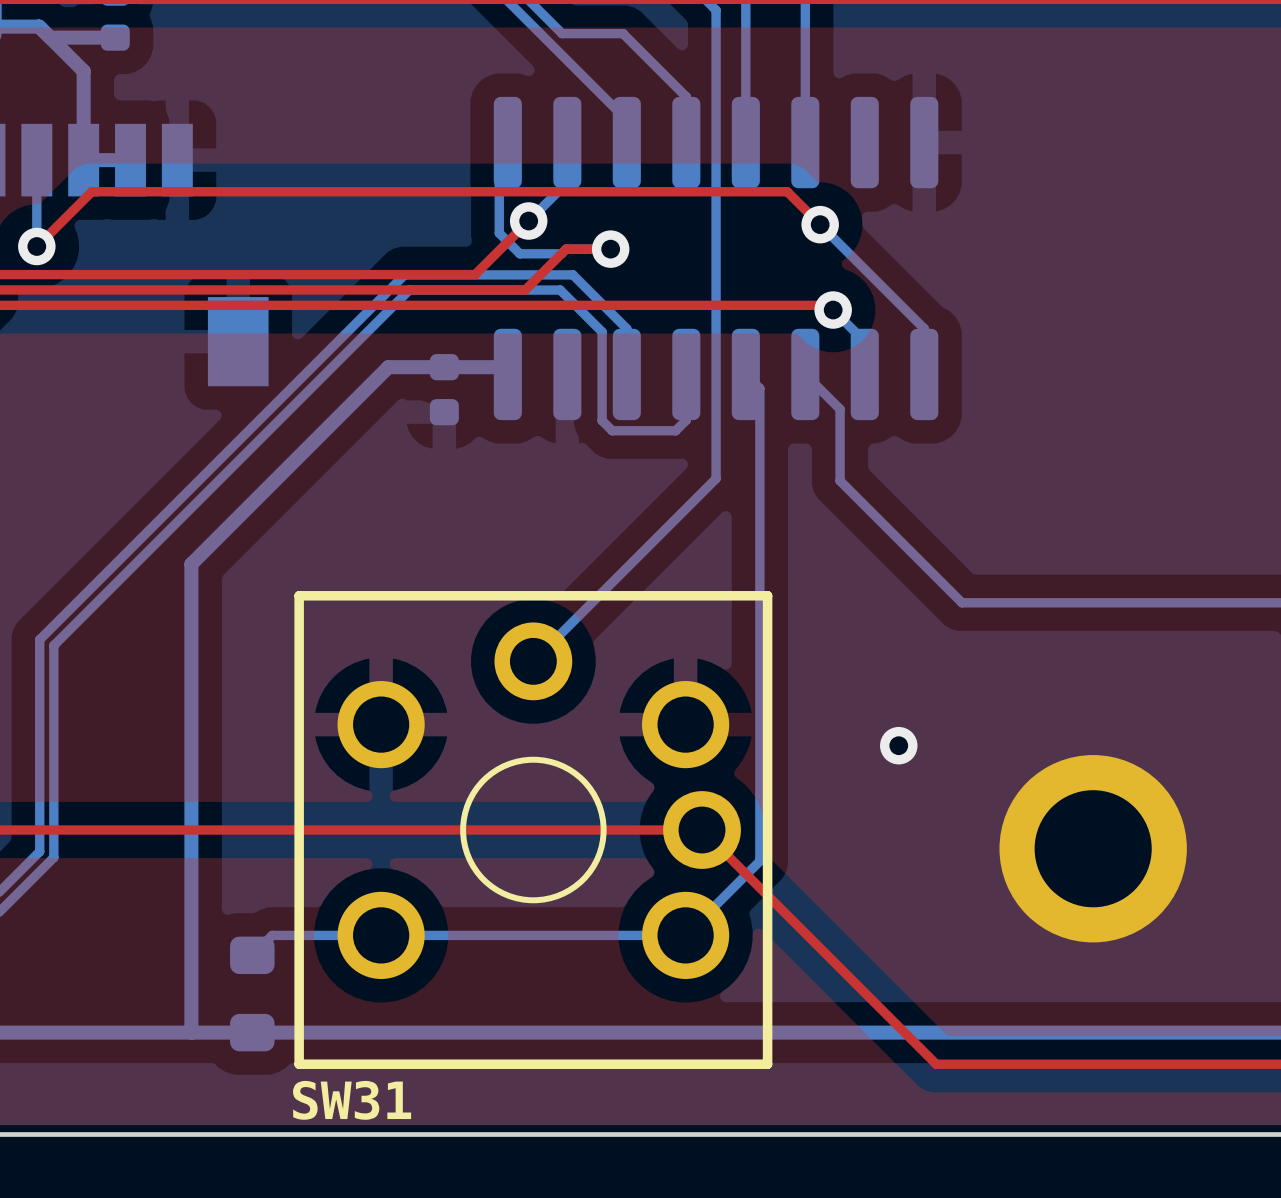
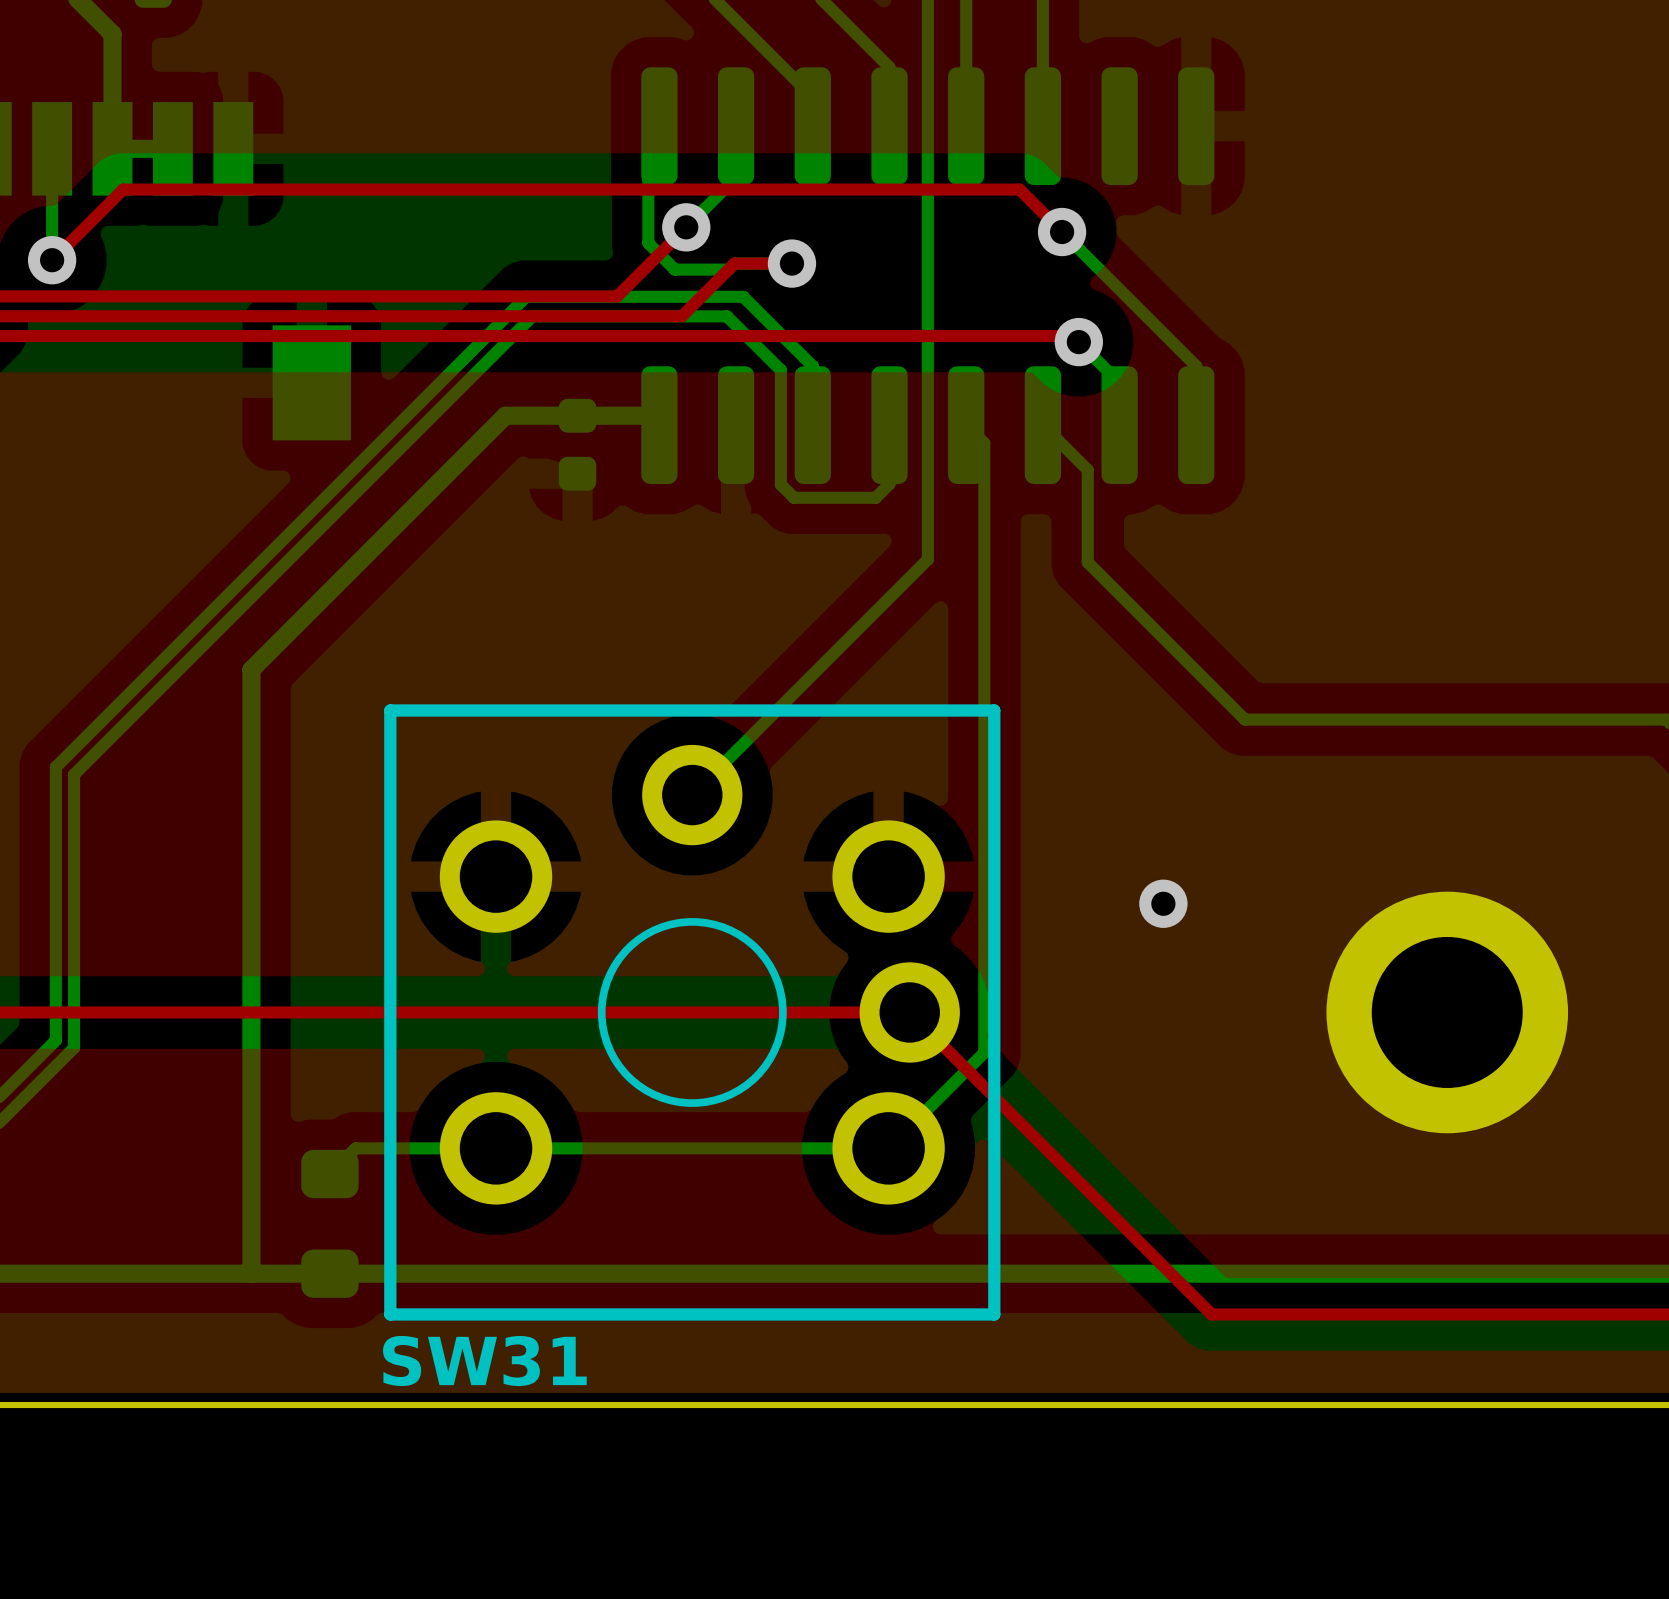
part position: (1093, 848) -> (1447, 1012)

